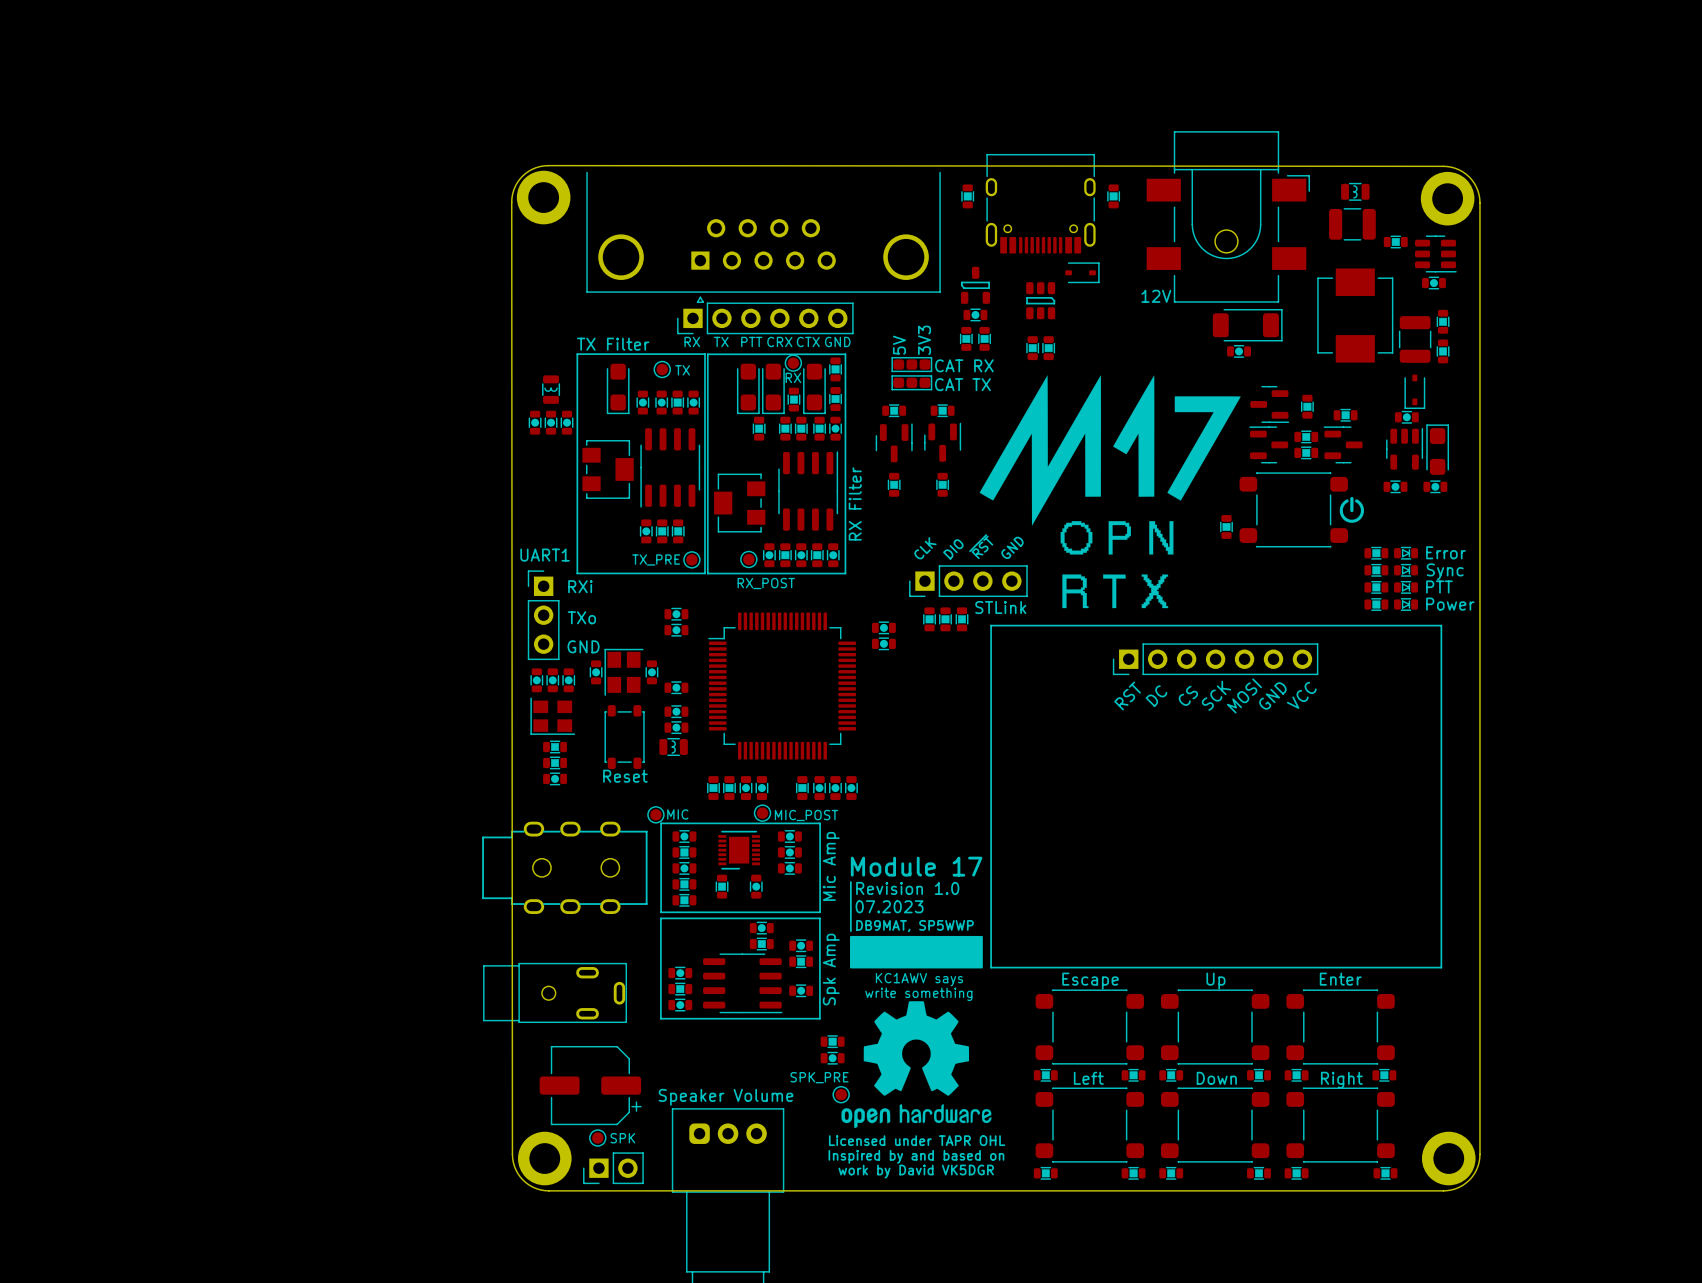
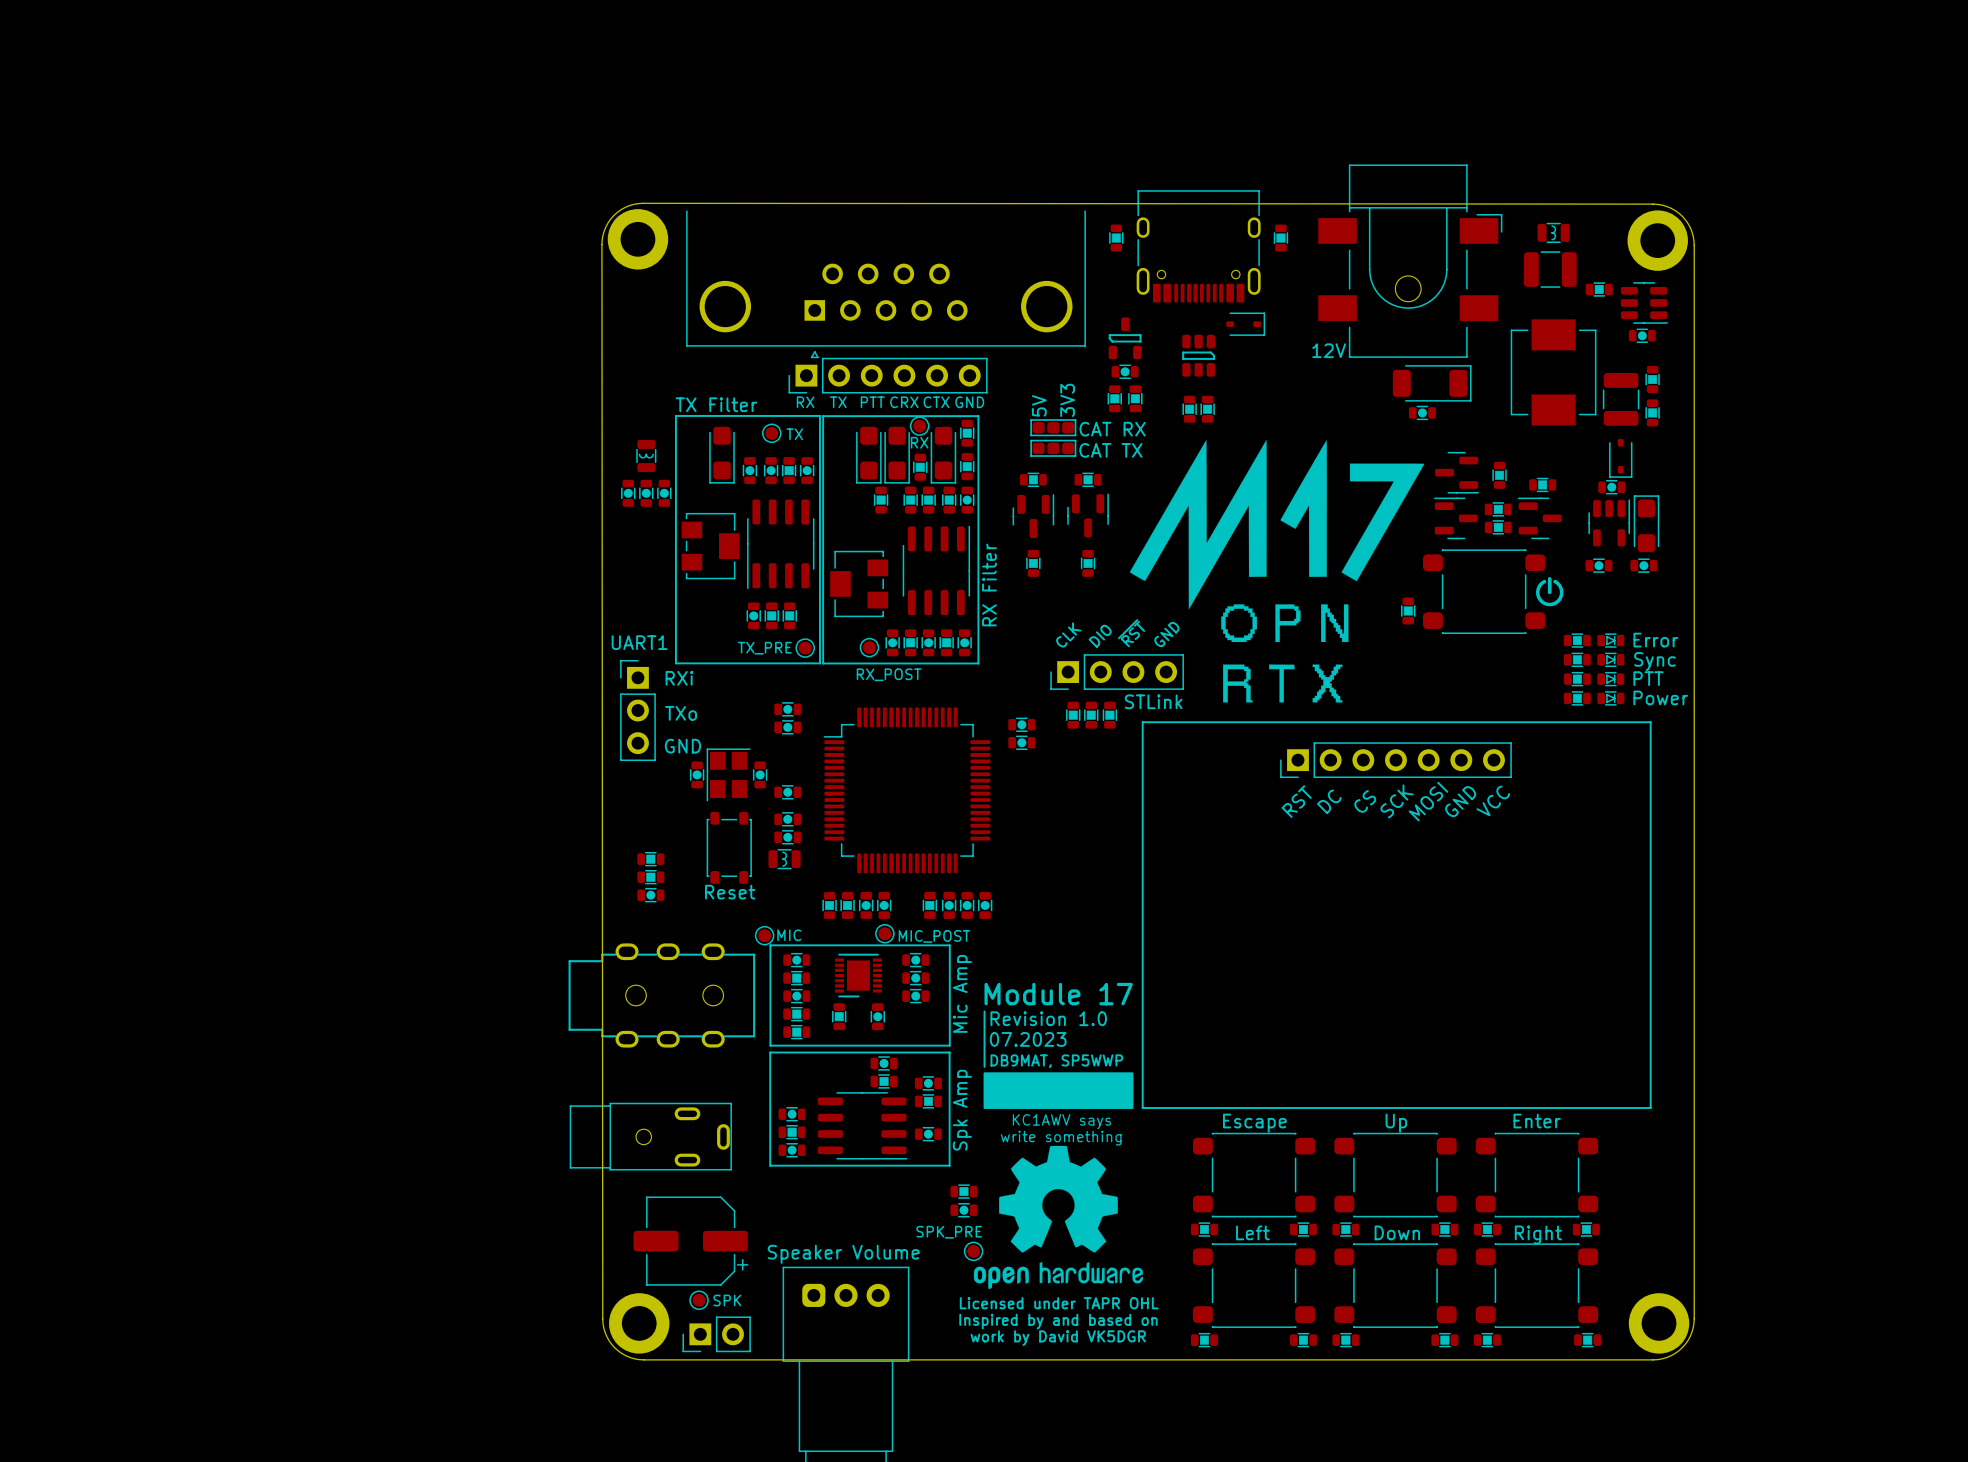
part: (536, 680) -> none
part: (552, 680) -> none
part: (568, 680) -> none
part: (552, 716) -> none

